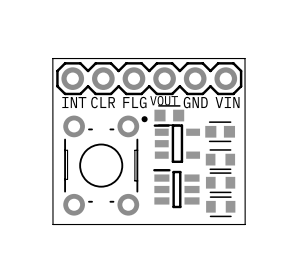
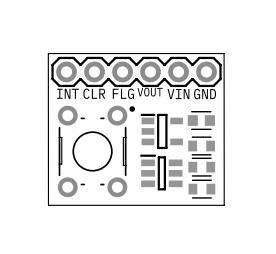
text: GND (195, 102) -> VIN (178, 94)
text: VIN (227, 102) -> GND (205, 94)
part: (169, 115) -> none

